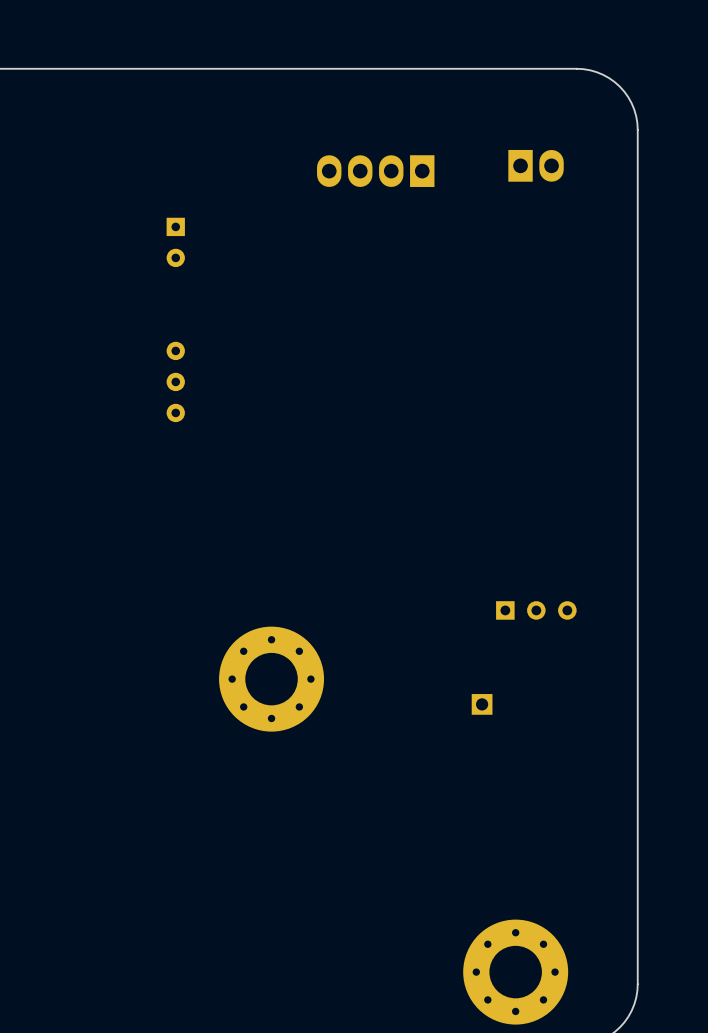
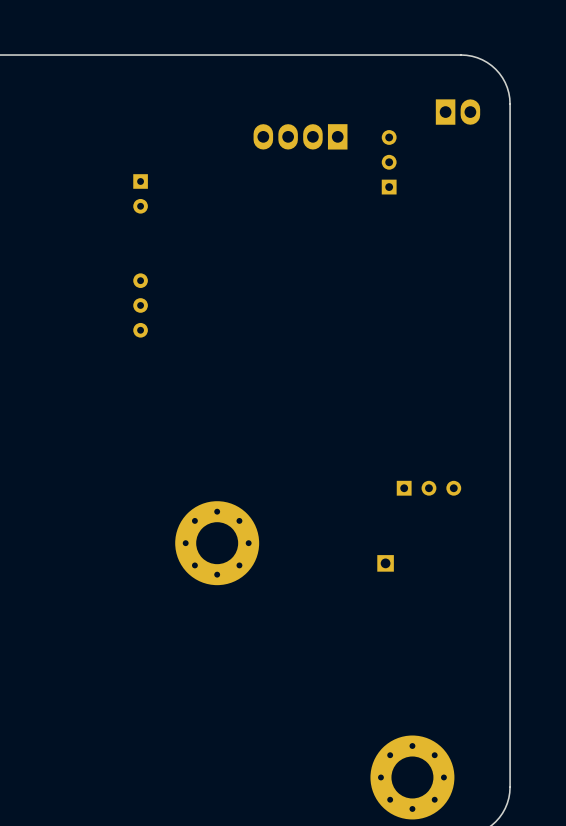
part position: (536, 165) -> (457, 112)
part: none -> (389, 162)

